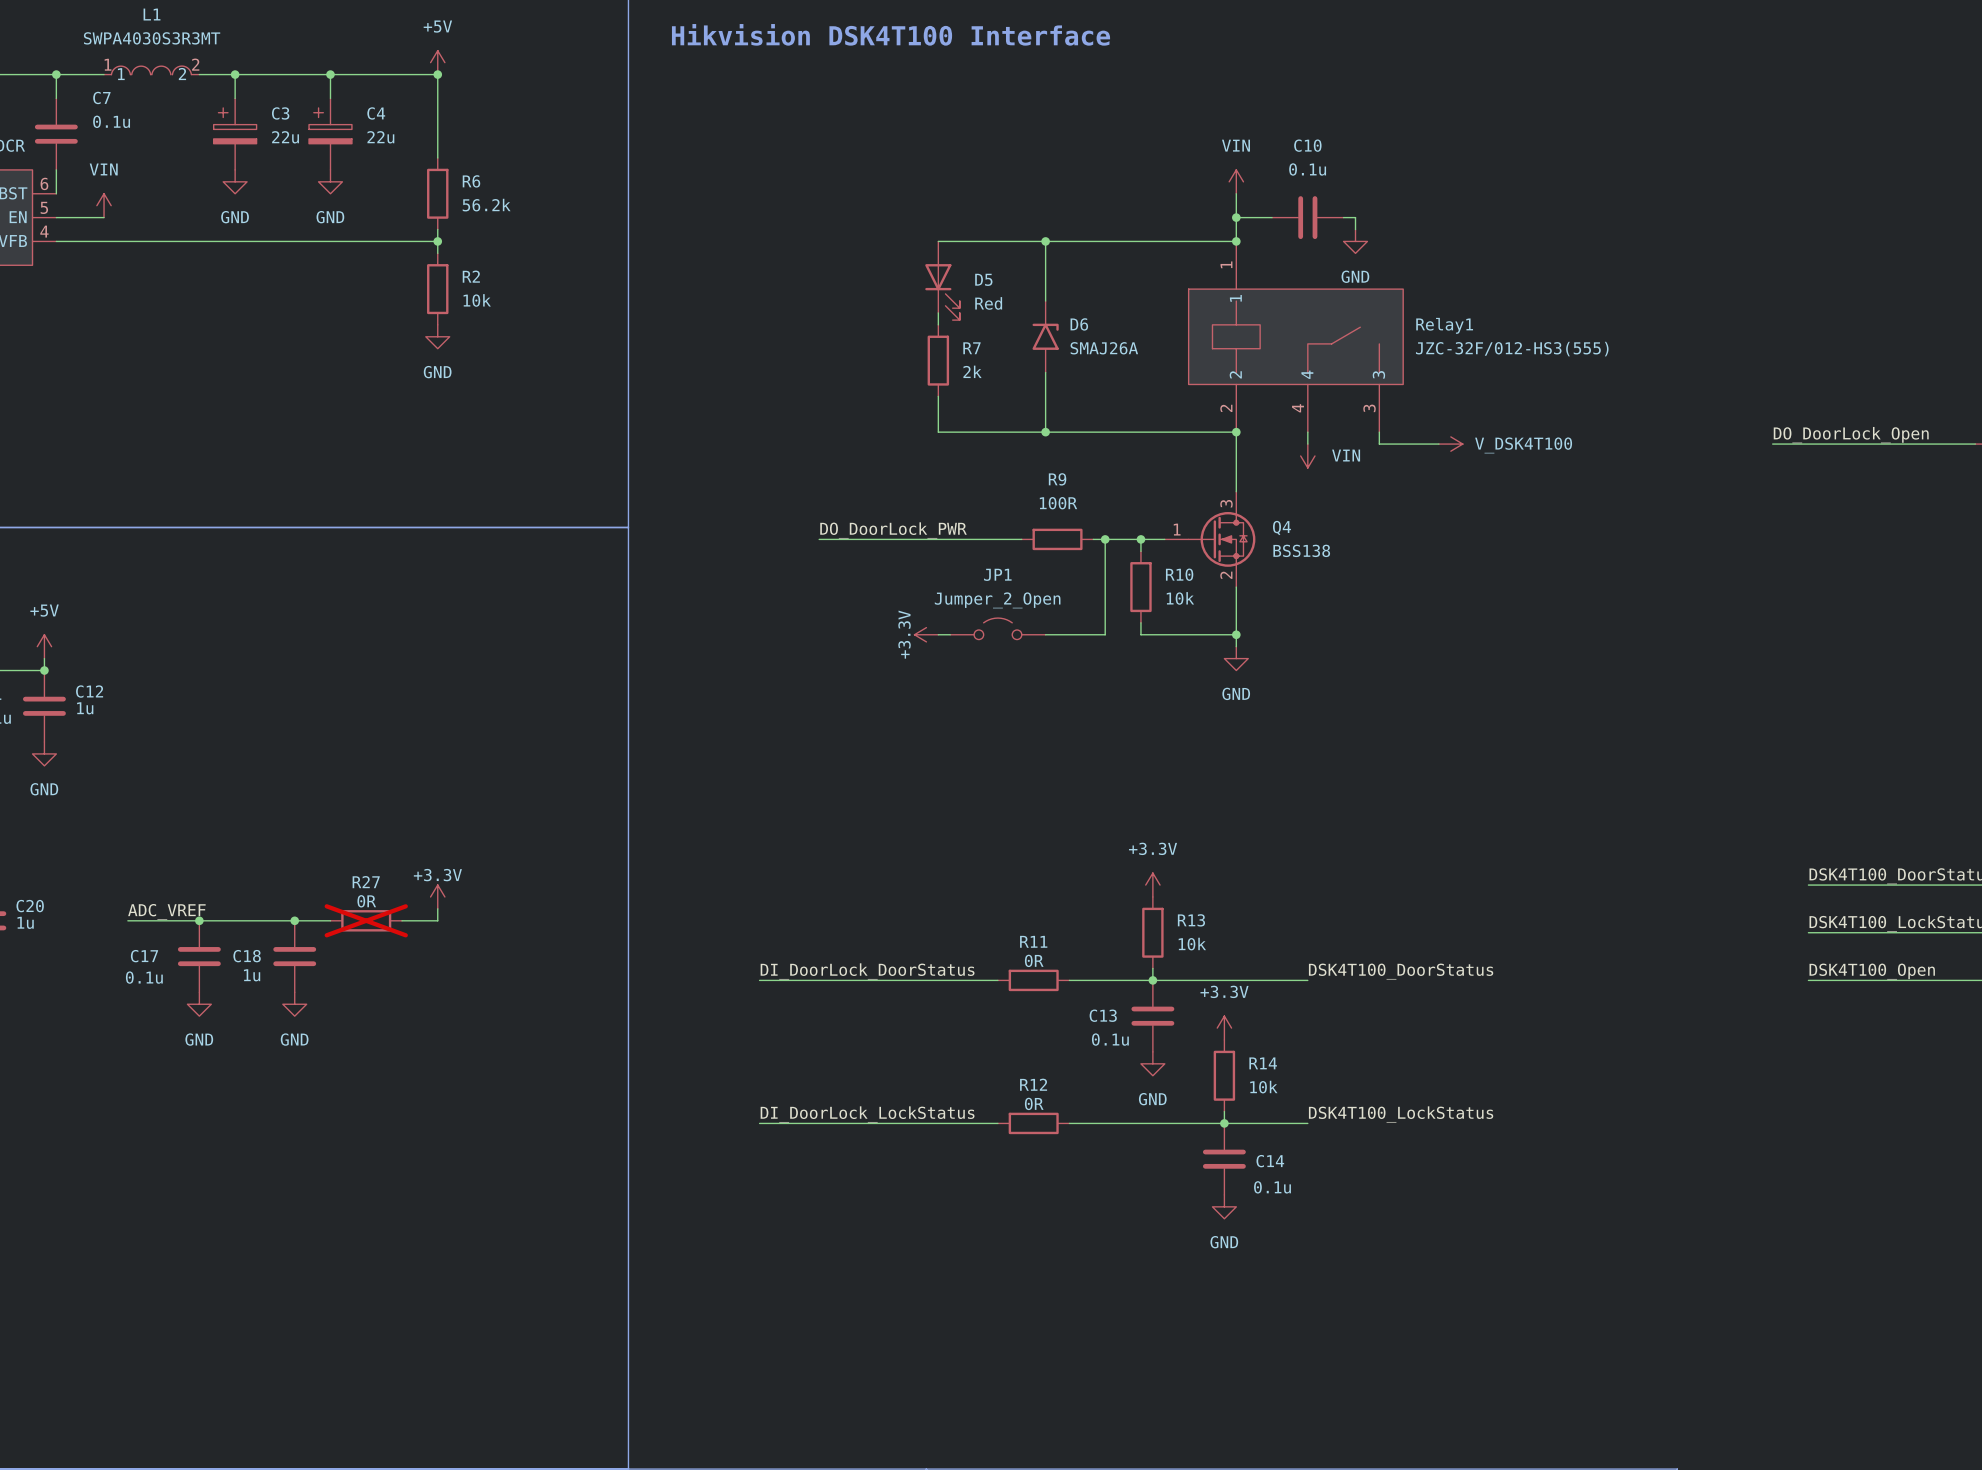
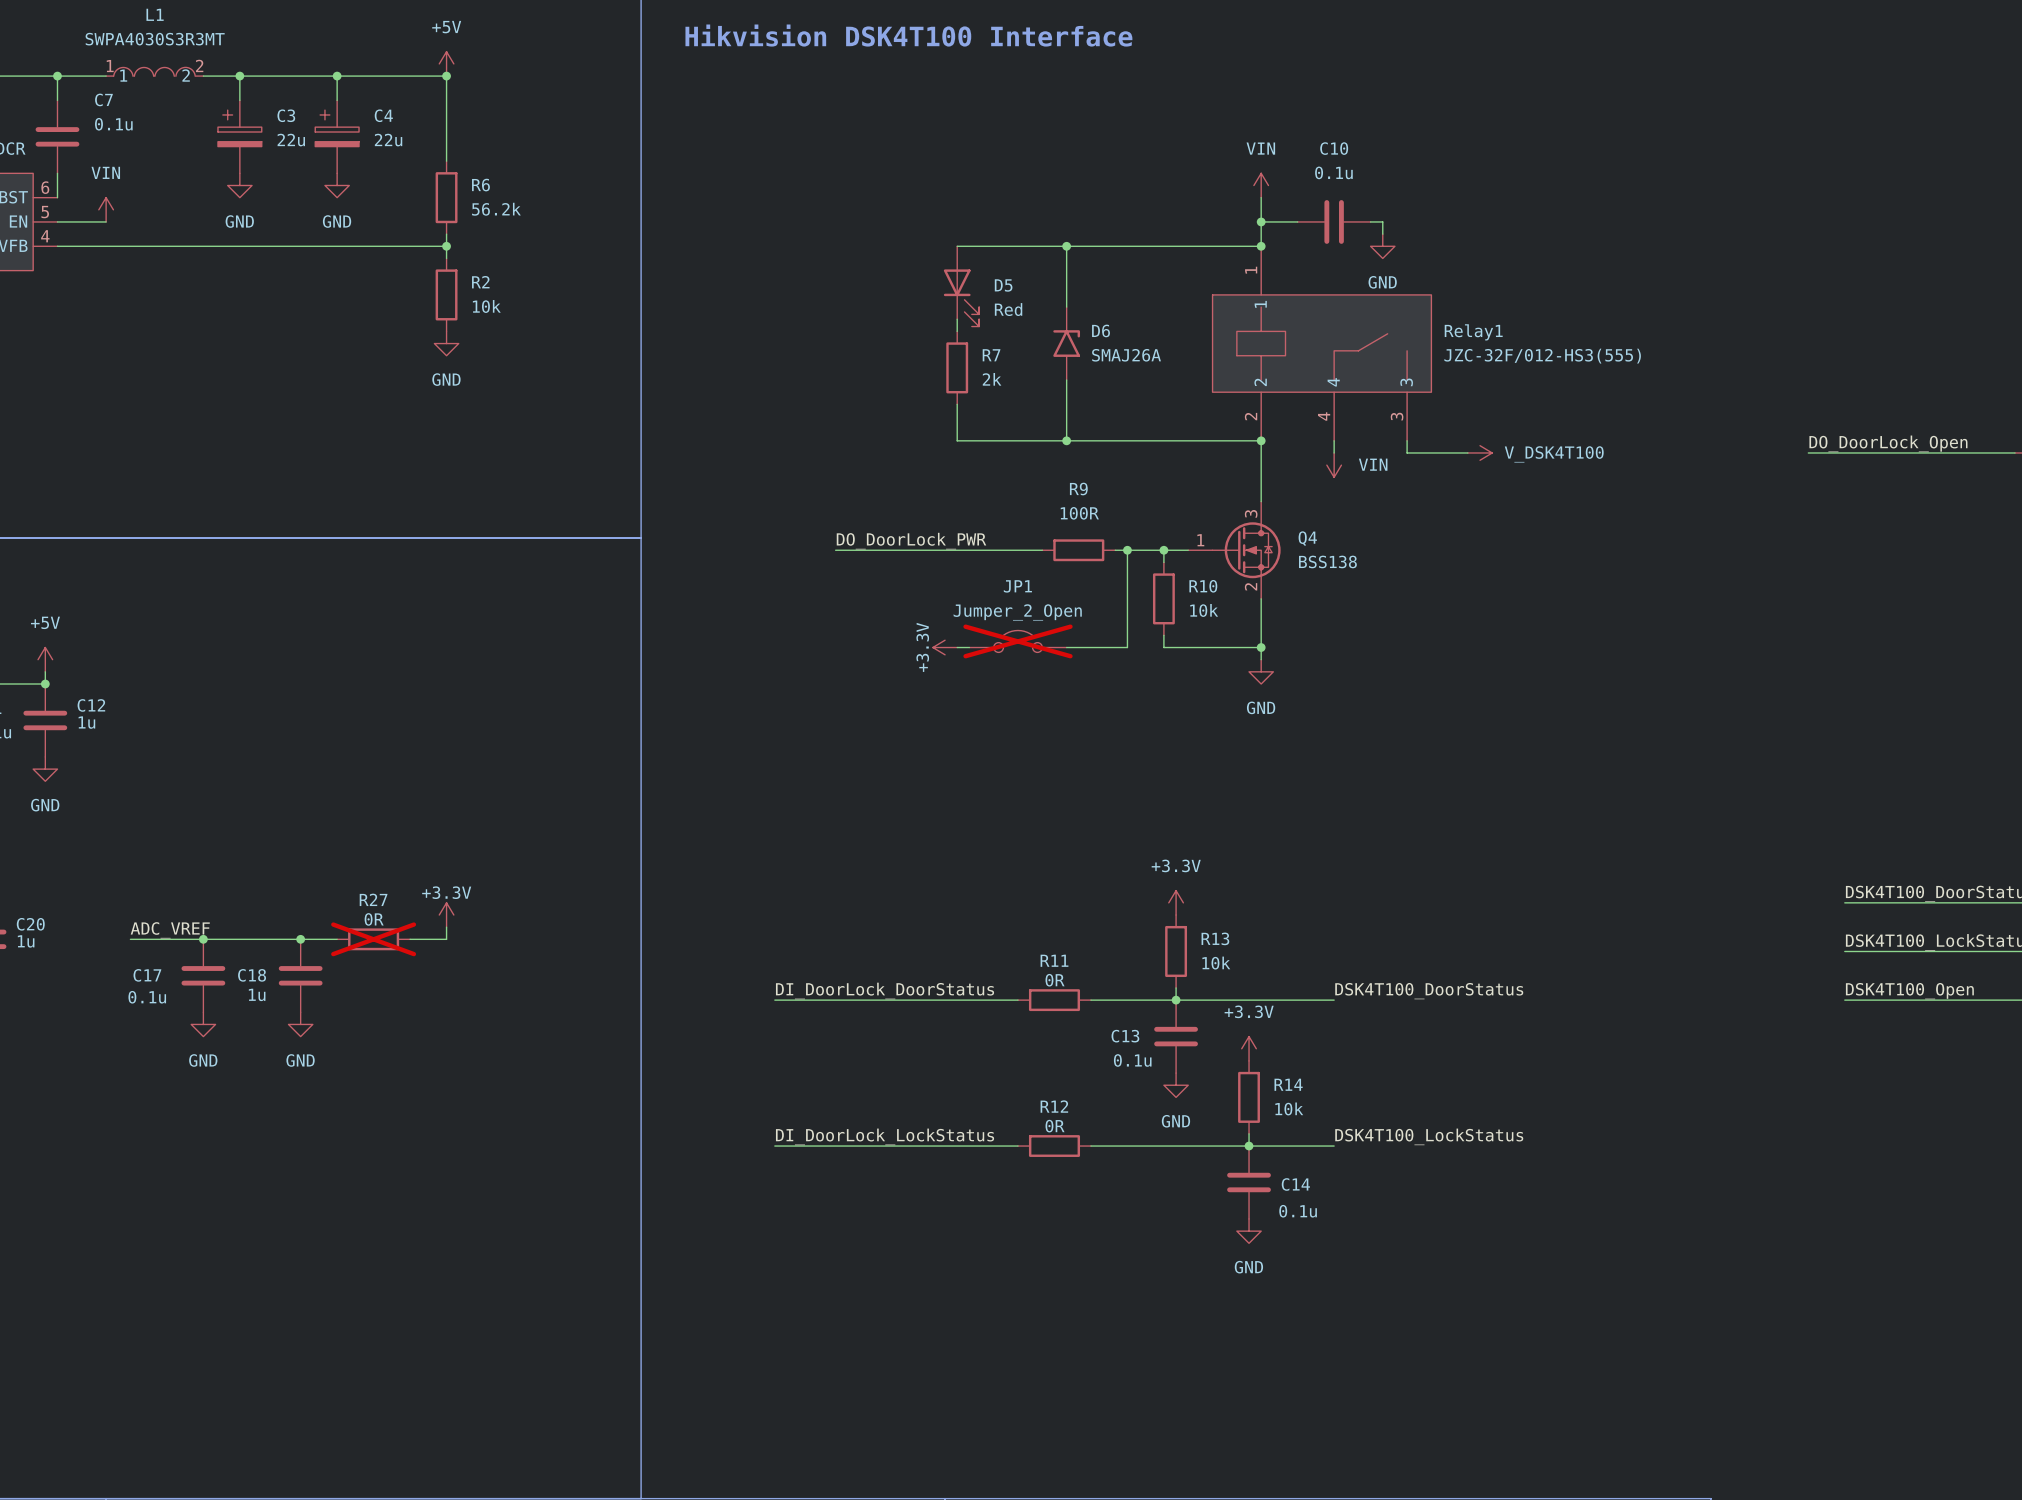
JP1 do-not-place cross: none -> (1018, 641)

